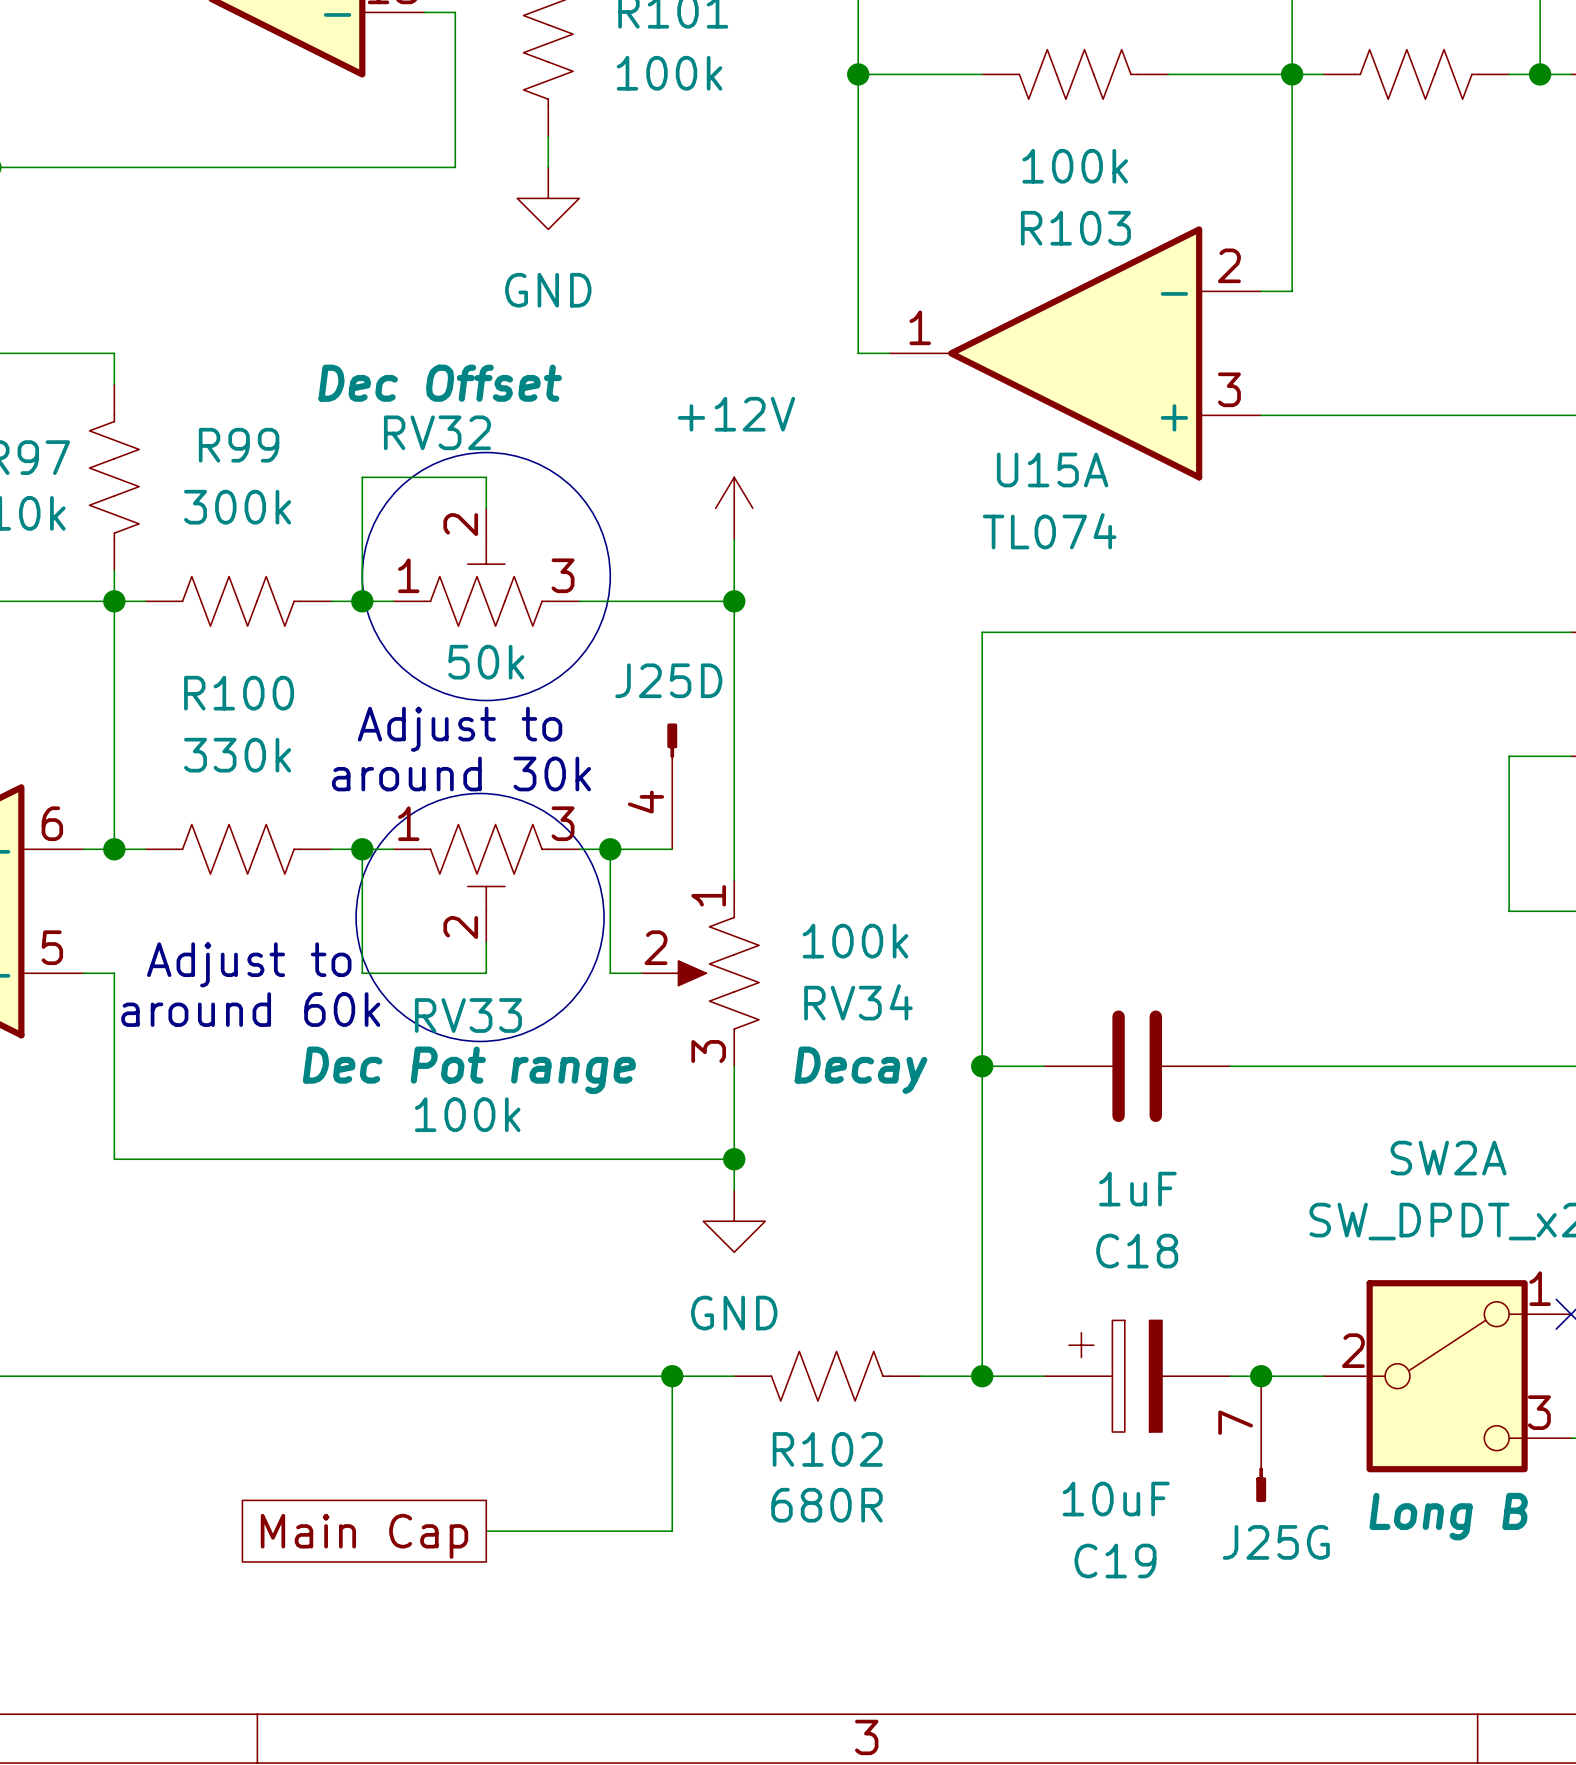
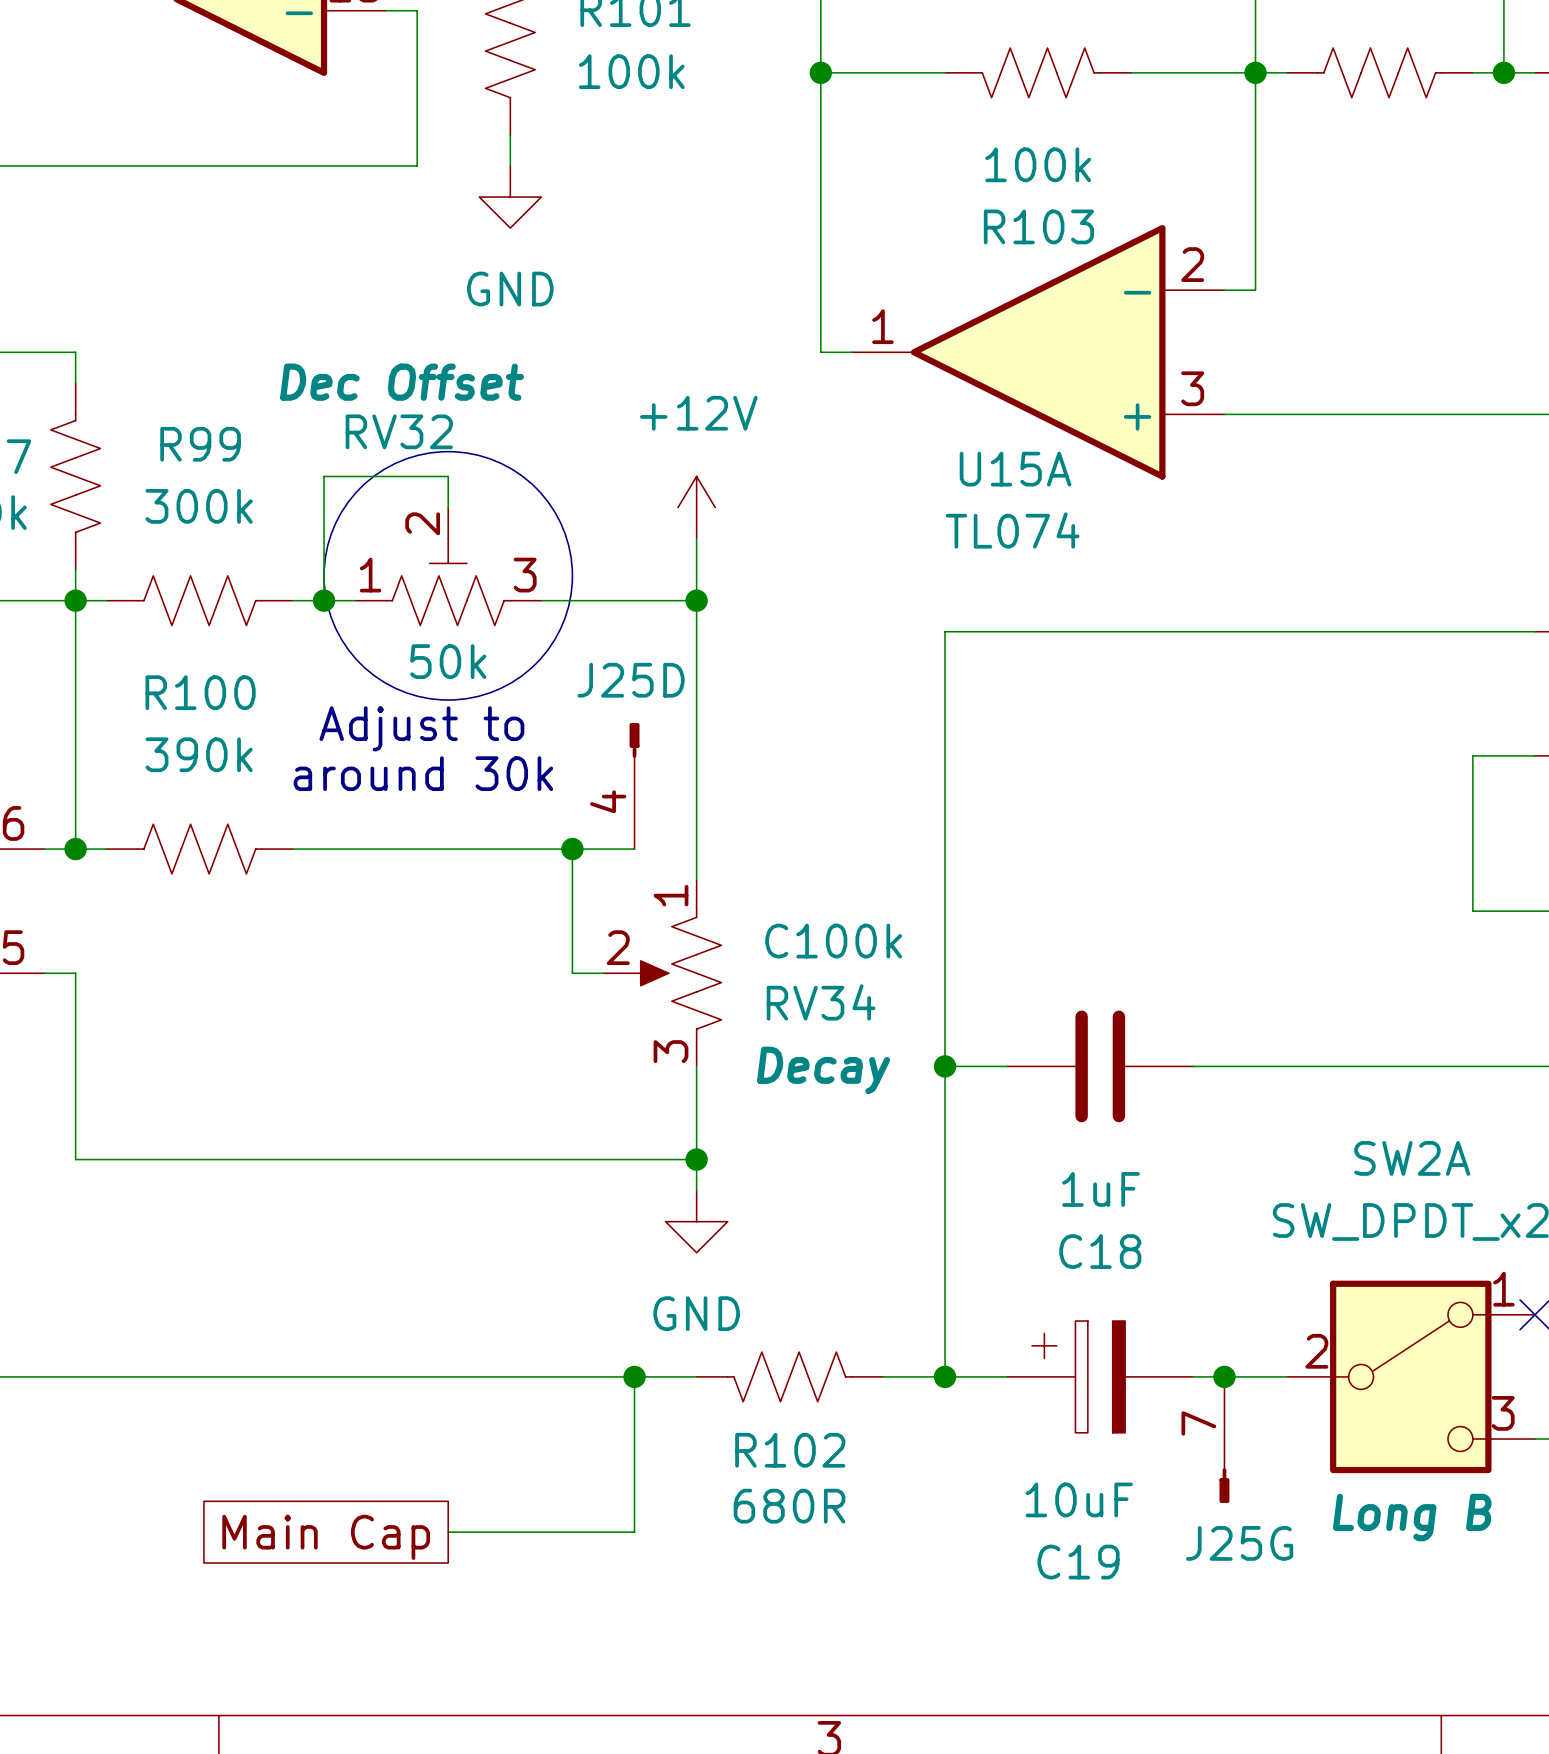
R100 value: 330k (237, 755) -> 390k (199, 754)
drawing: [356, 793, 605, 1042] -> none
wire: (362, 849) (362, 973) (486, 973) (486, 942) -> none
junction: (362, 849) -> none
wire: none -> (355, 849) (541, 849)
RV33: 100k (486, 883) -> none
RV34 value: 100k (855, 941) -> C100k (833, 941)
text: Adjust to (249, 964) -> none
text: around 60k (250, 1009) -> none

